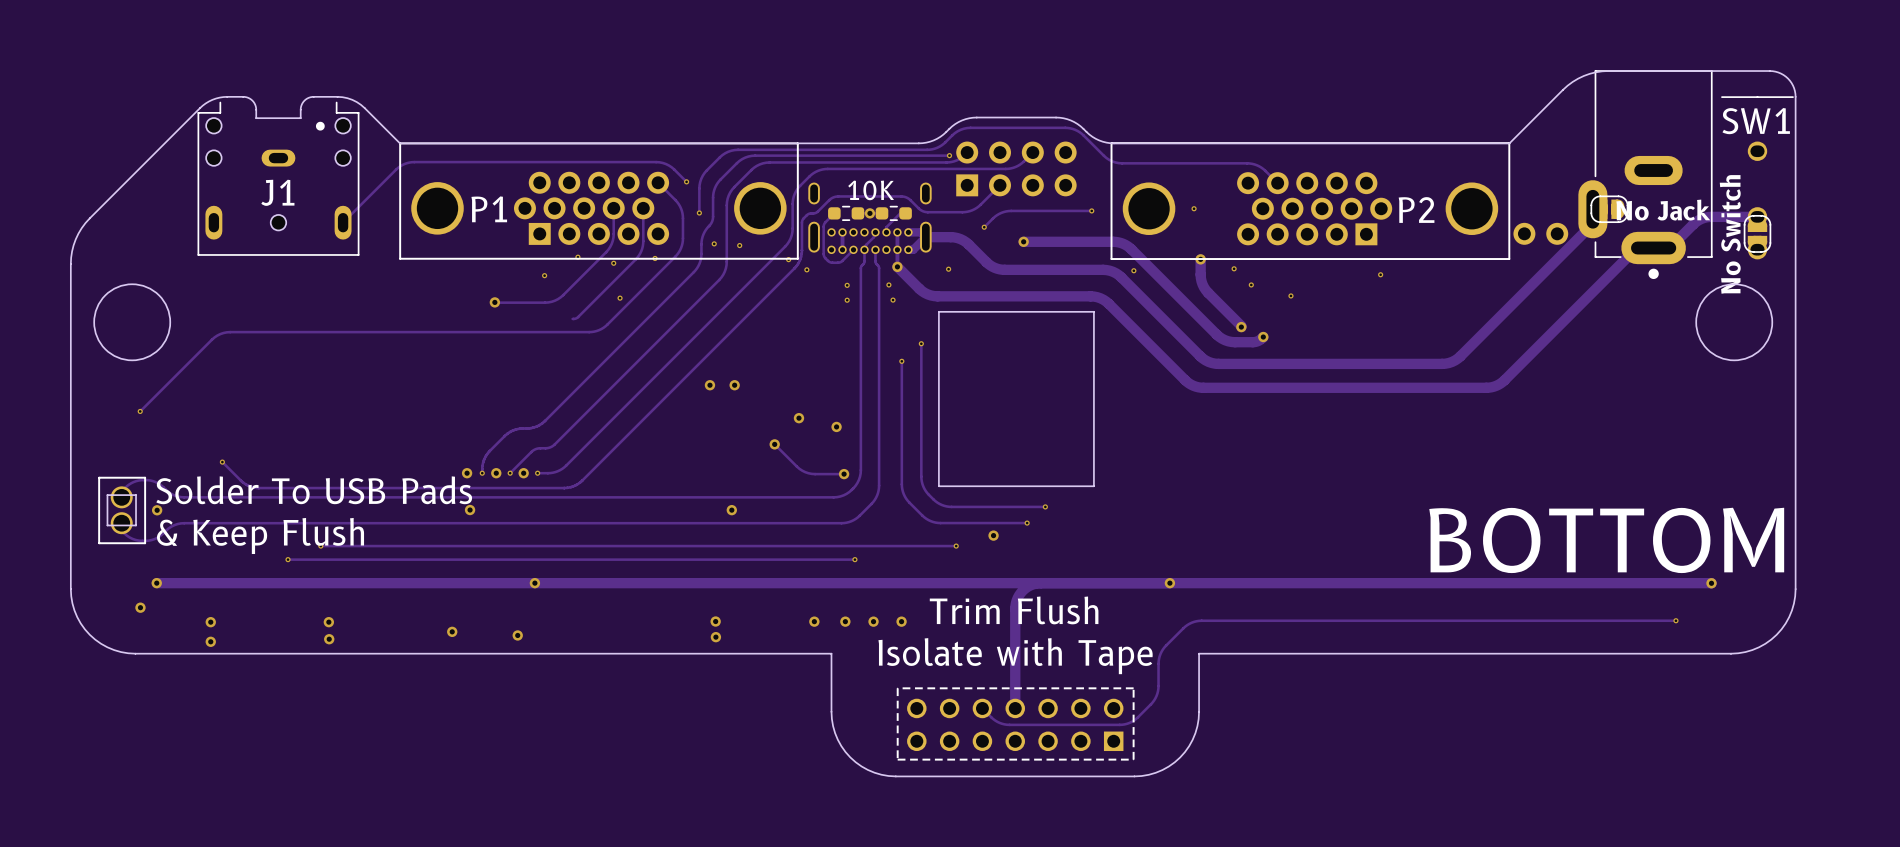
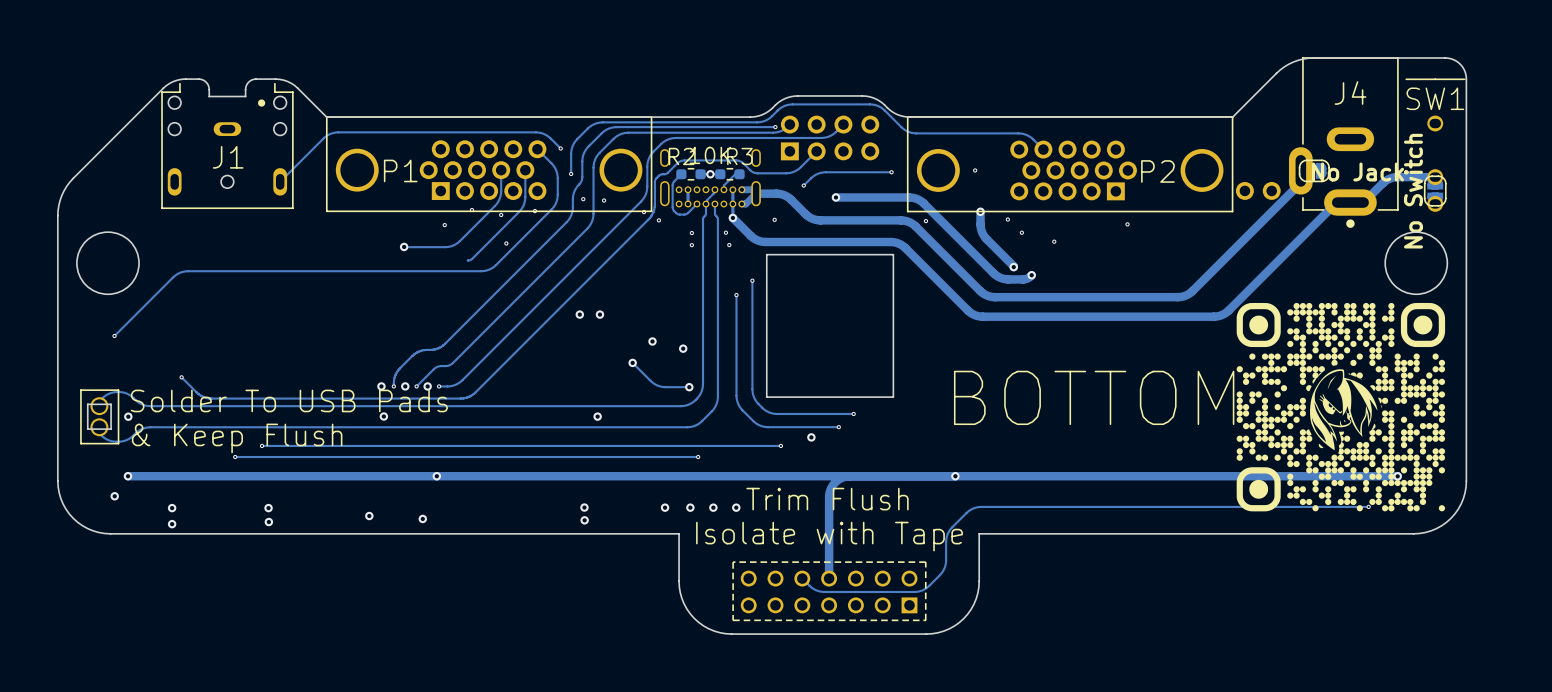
J4 name: none -> J4 (1350, 93)
R2 name: none -> R2 (681, 156)
R3 name: none -> R3 (739, 156)
drawing: none -> [1236, 302, 1446, 512]
text position: BOTTOM (1606, 540) -> BOTTOM (1094, 397)

